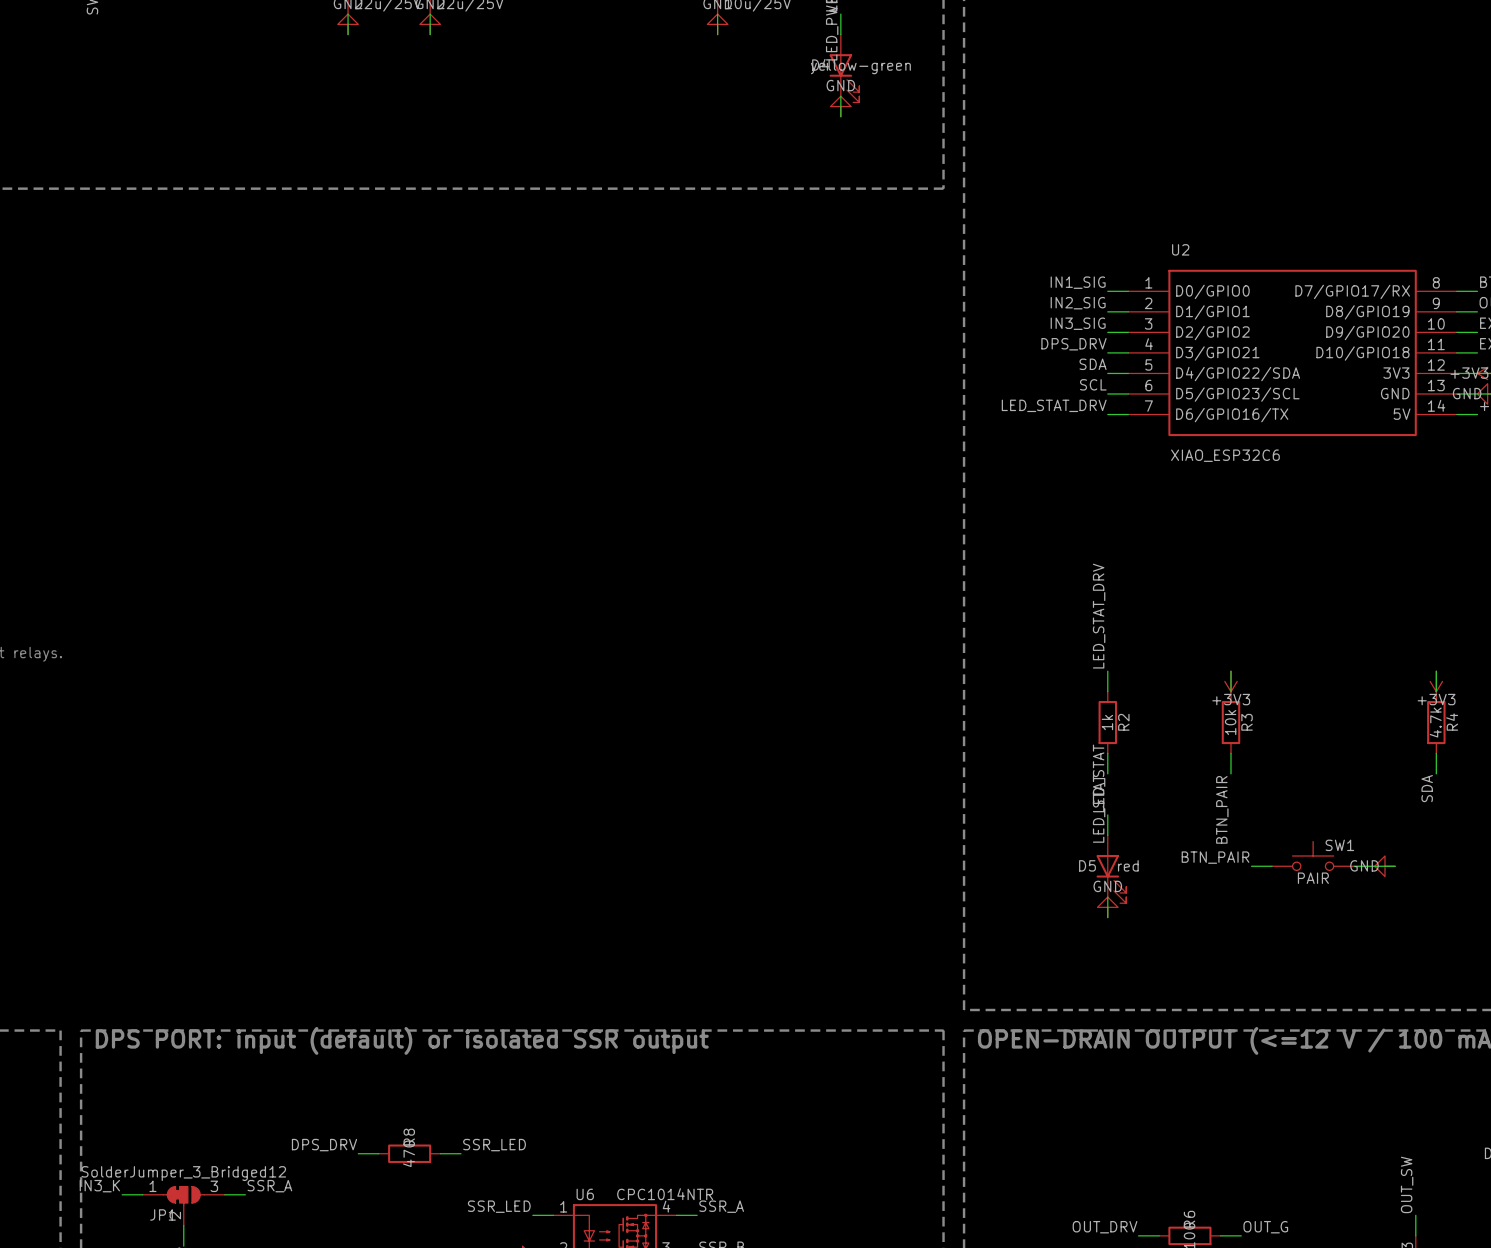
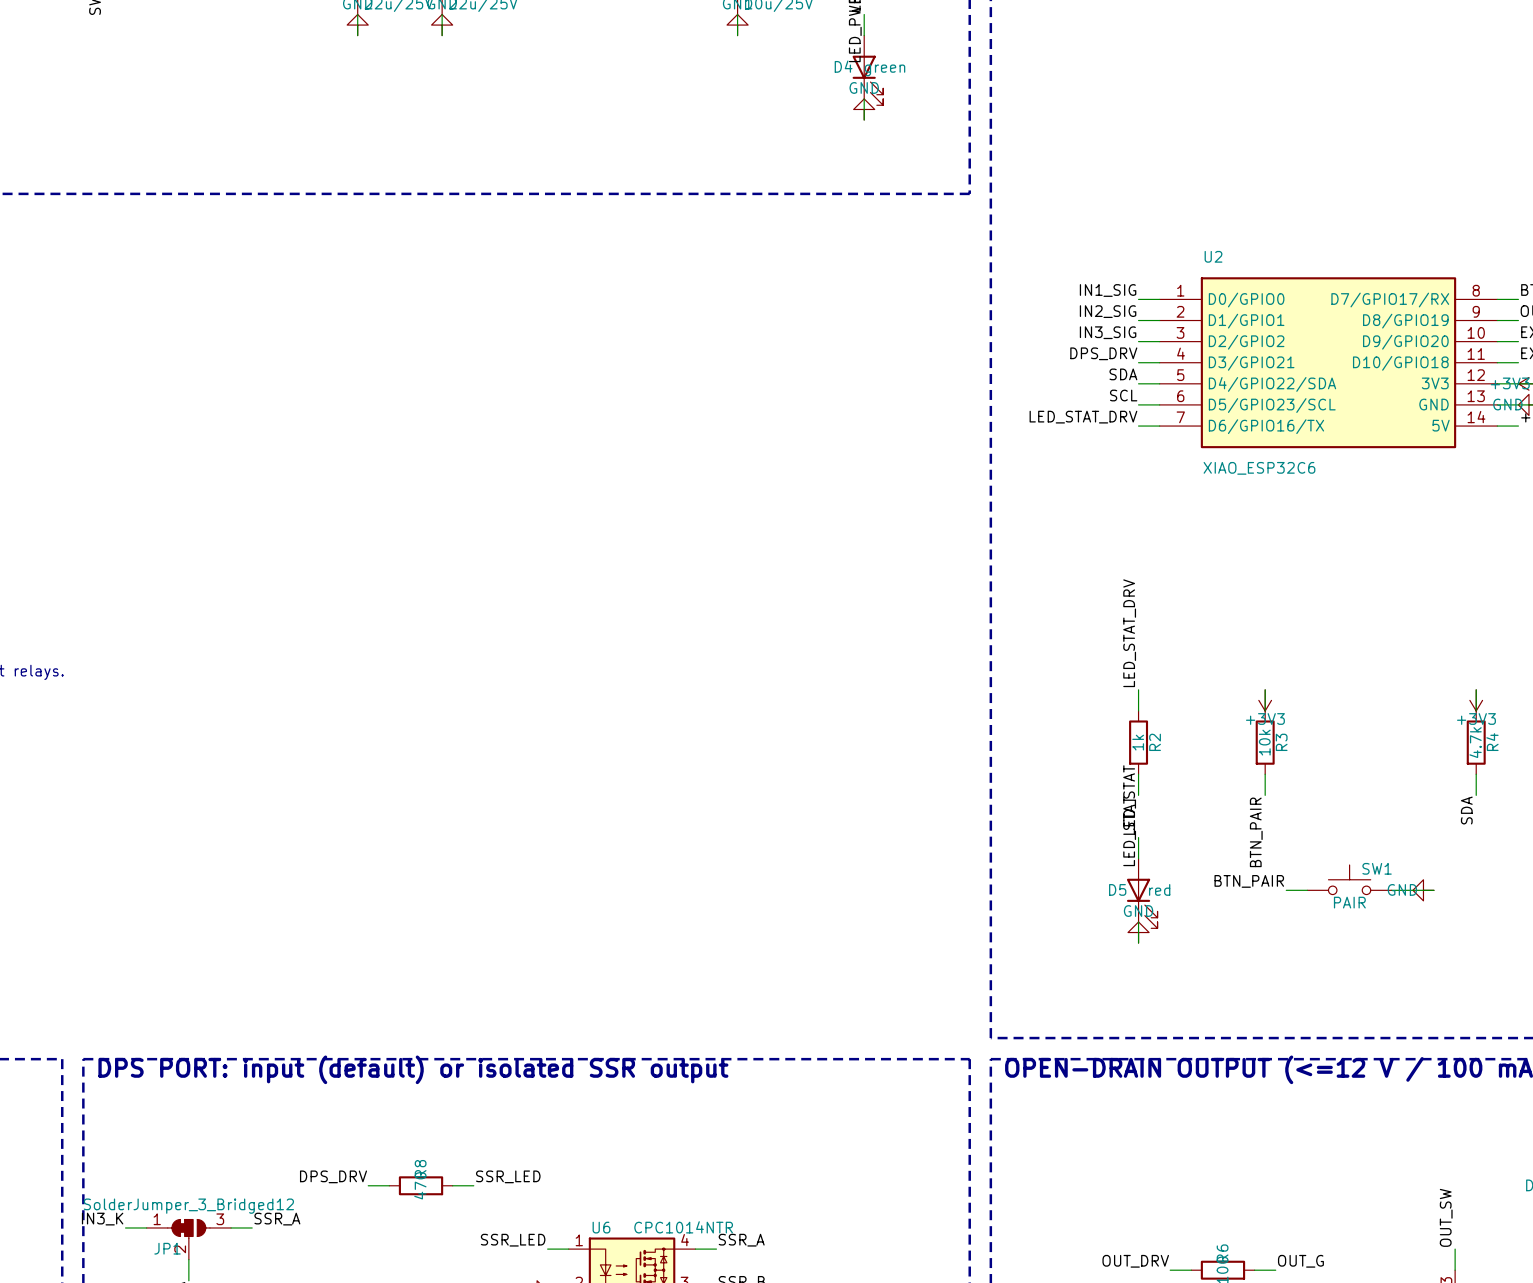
D4 value: yellow-green (860, 66) -> green (885, 70)

